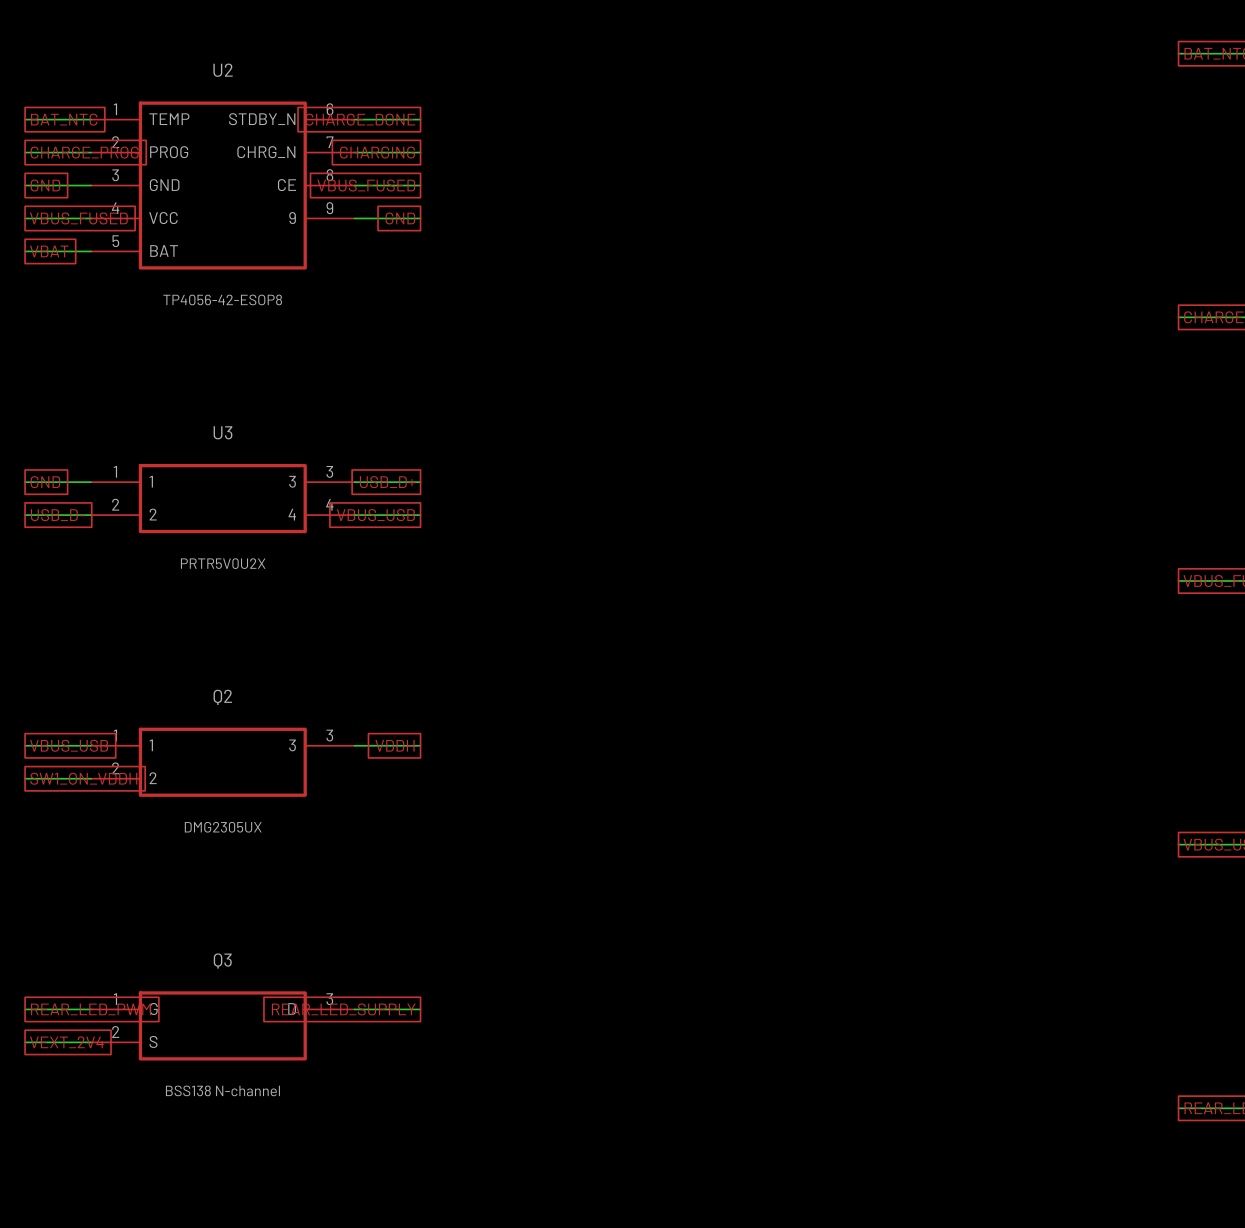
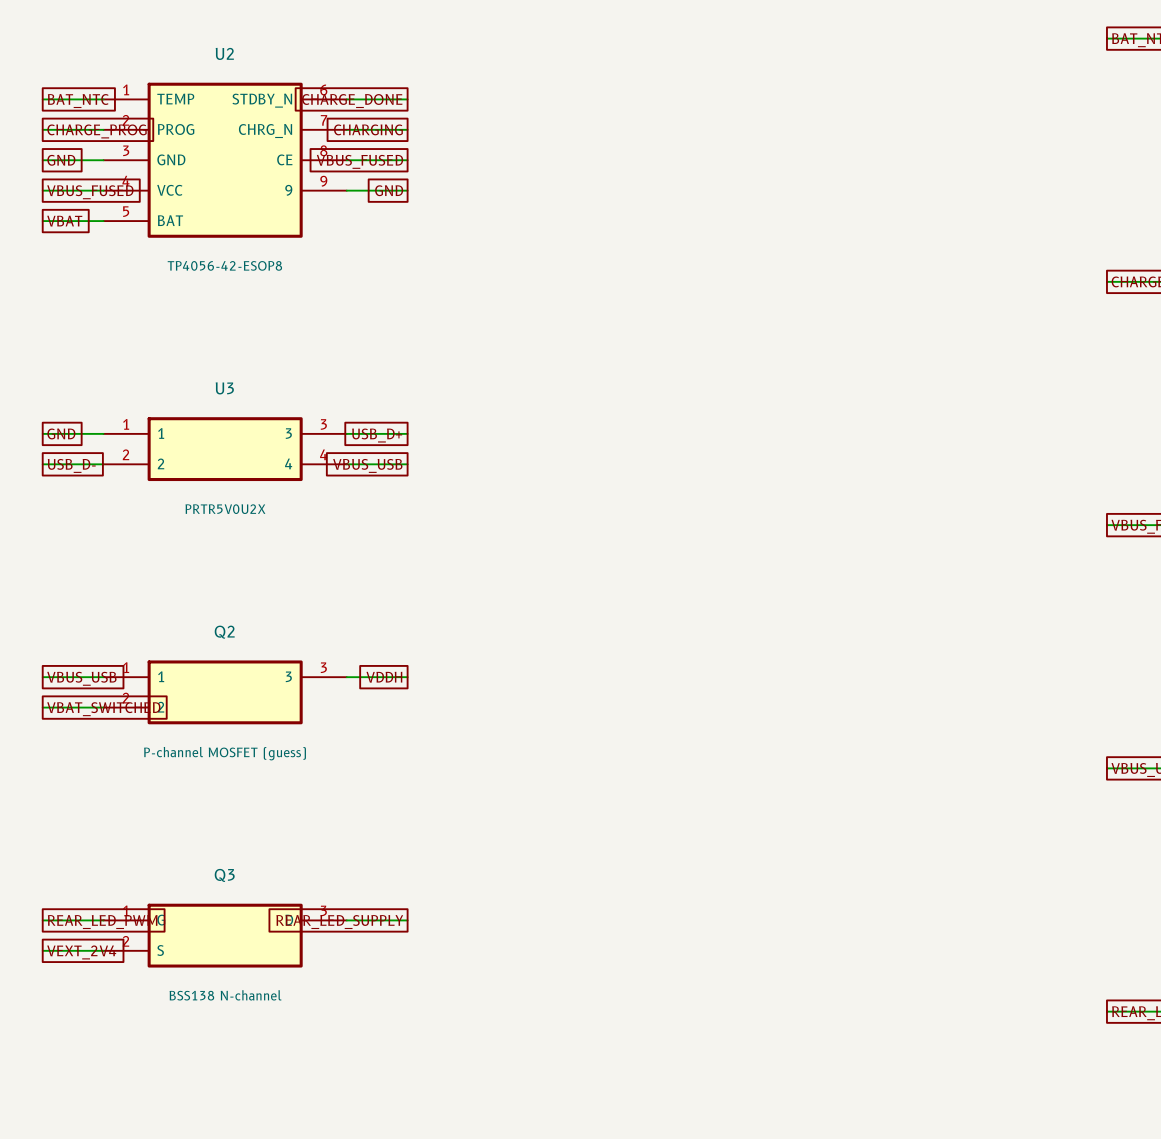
global label: SW1_ON_VDDH (83, 778) -> VBAT_SWITCHED (103, 709)
Q2 value: DMG2305UX (223, 827) -> P-channel MOSFET (guess) (225, 753)

